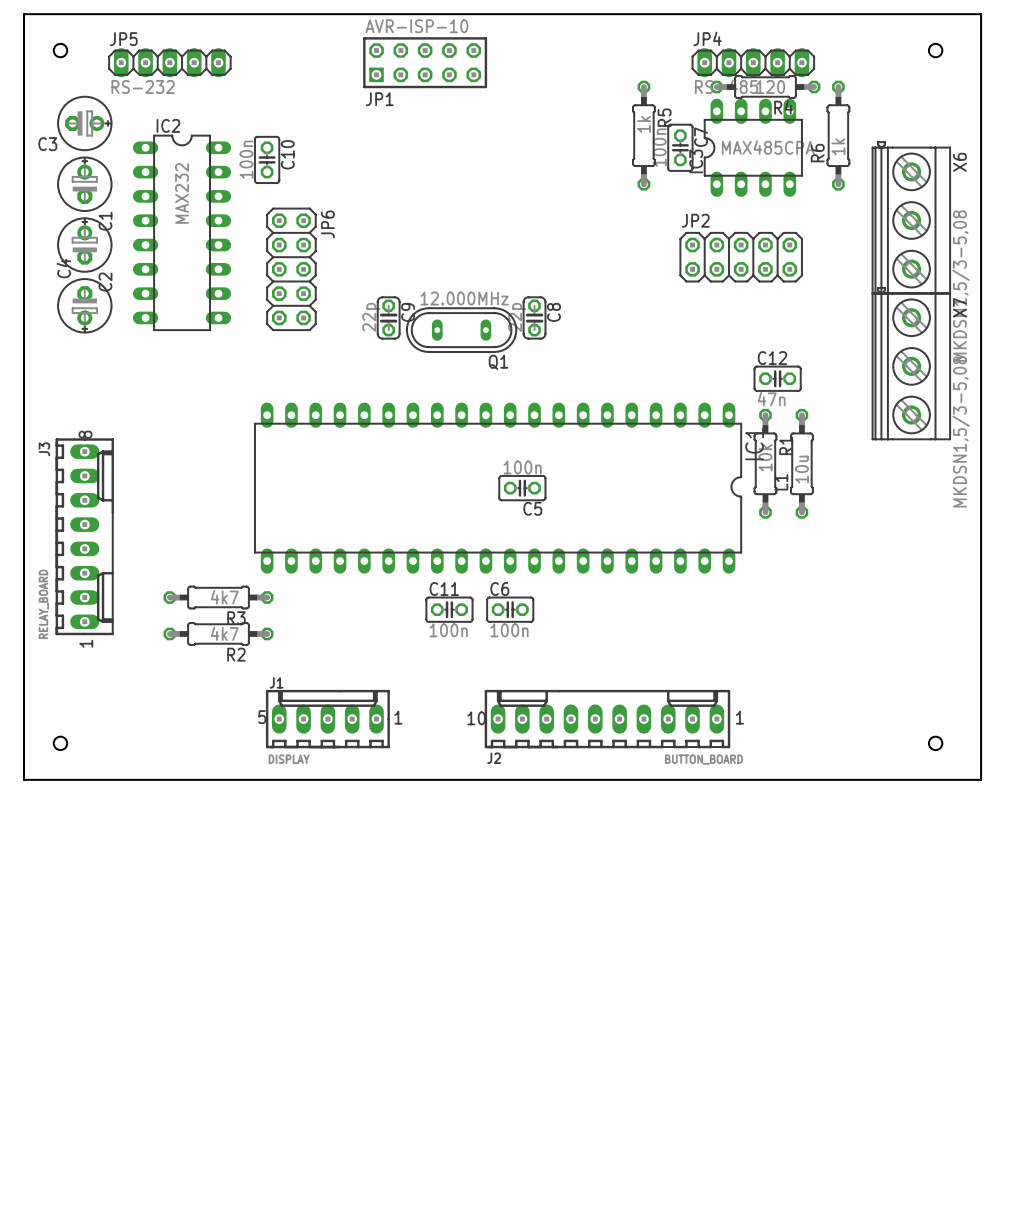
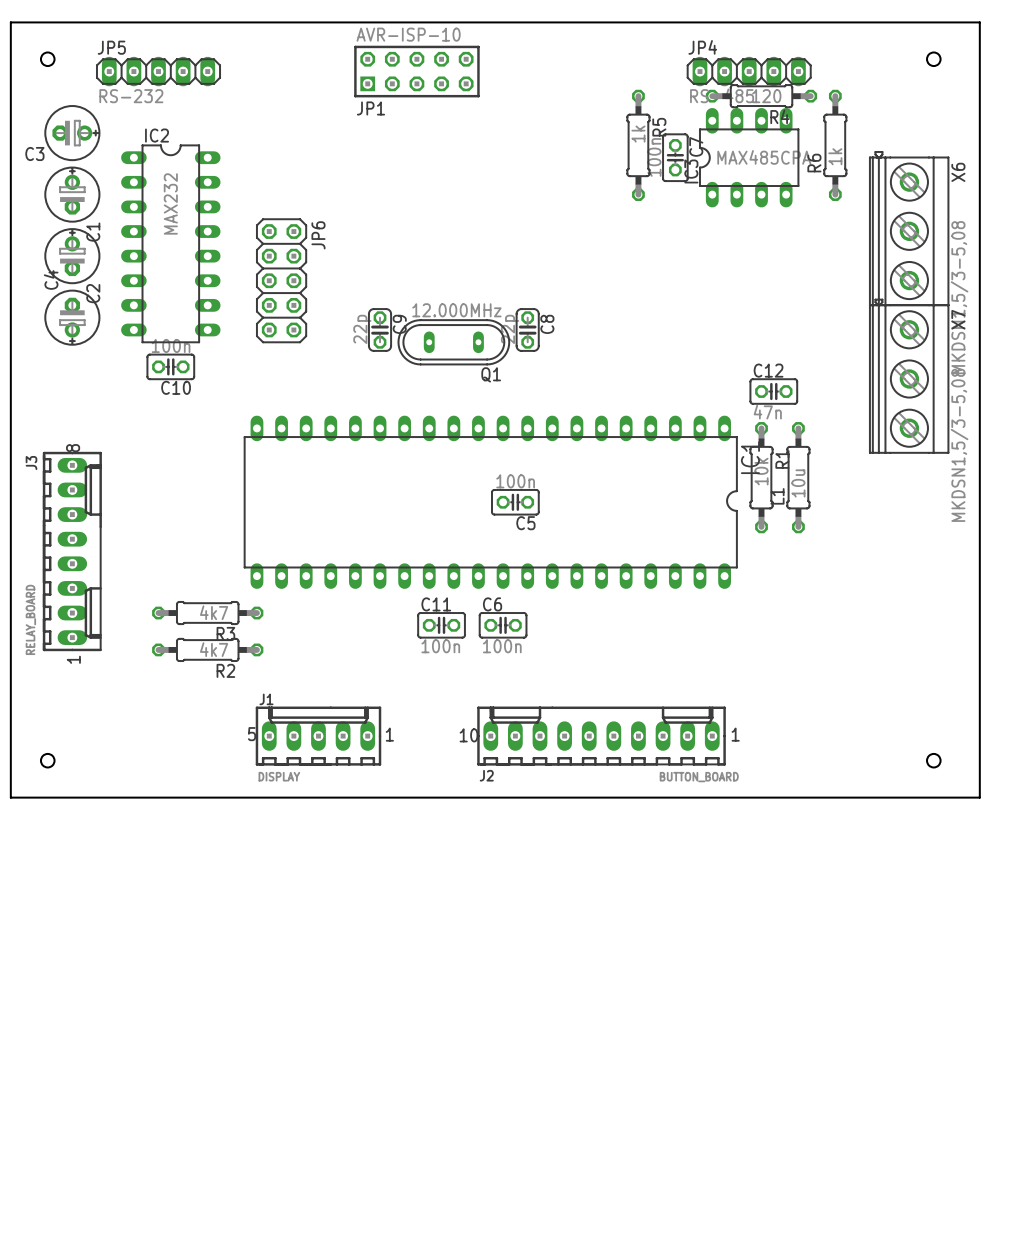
C10 rotation: 0° (267, 159) -> 90° clockwise (170, 366)
C10 position: (267, 159) -> (170, 366)
JP2: (741, 257) -> none

